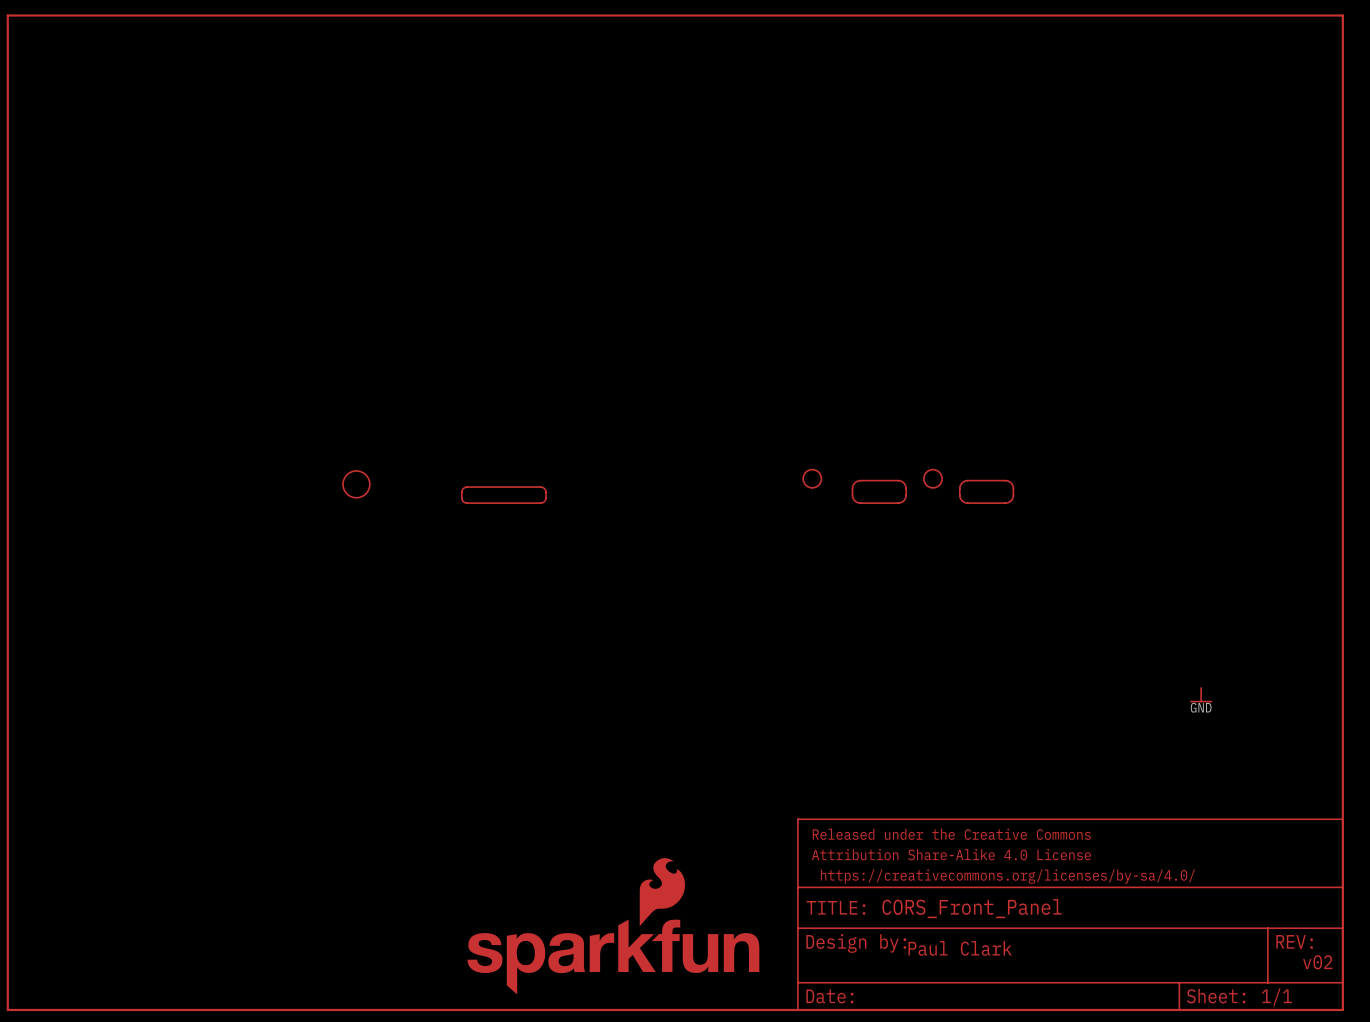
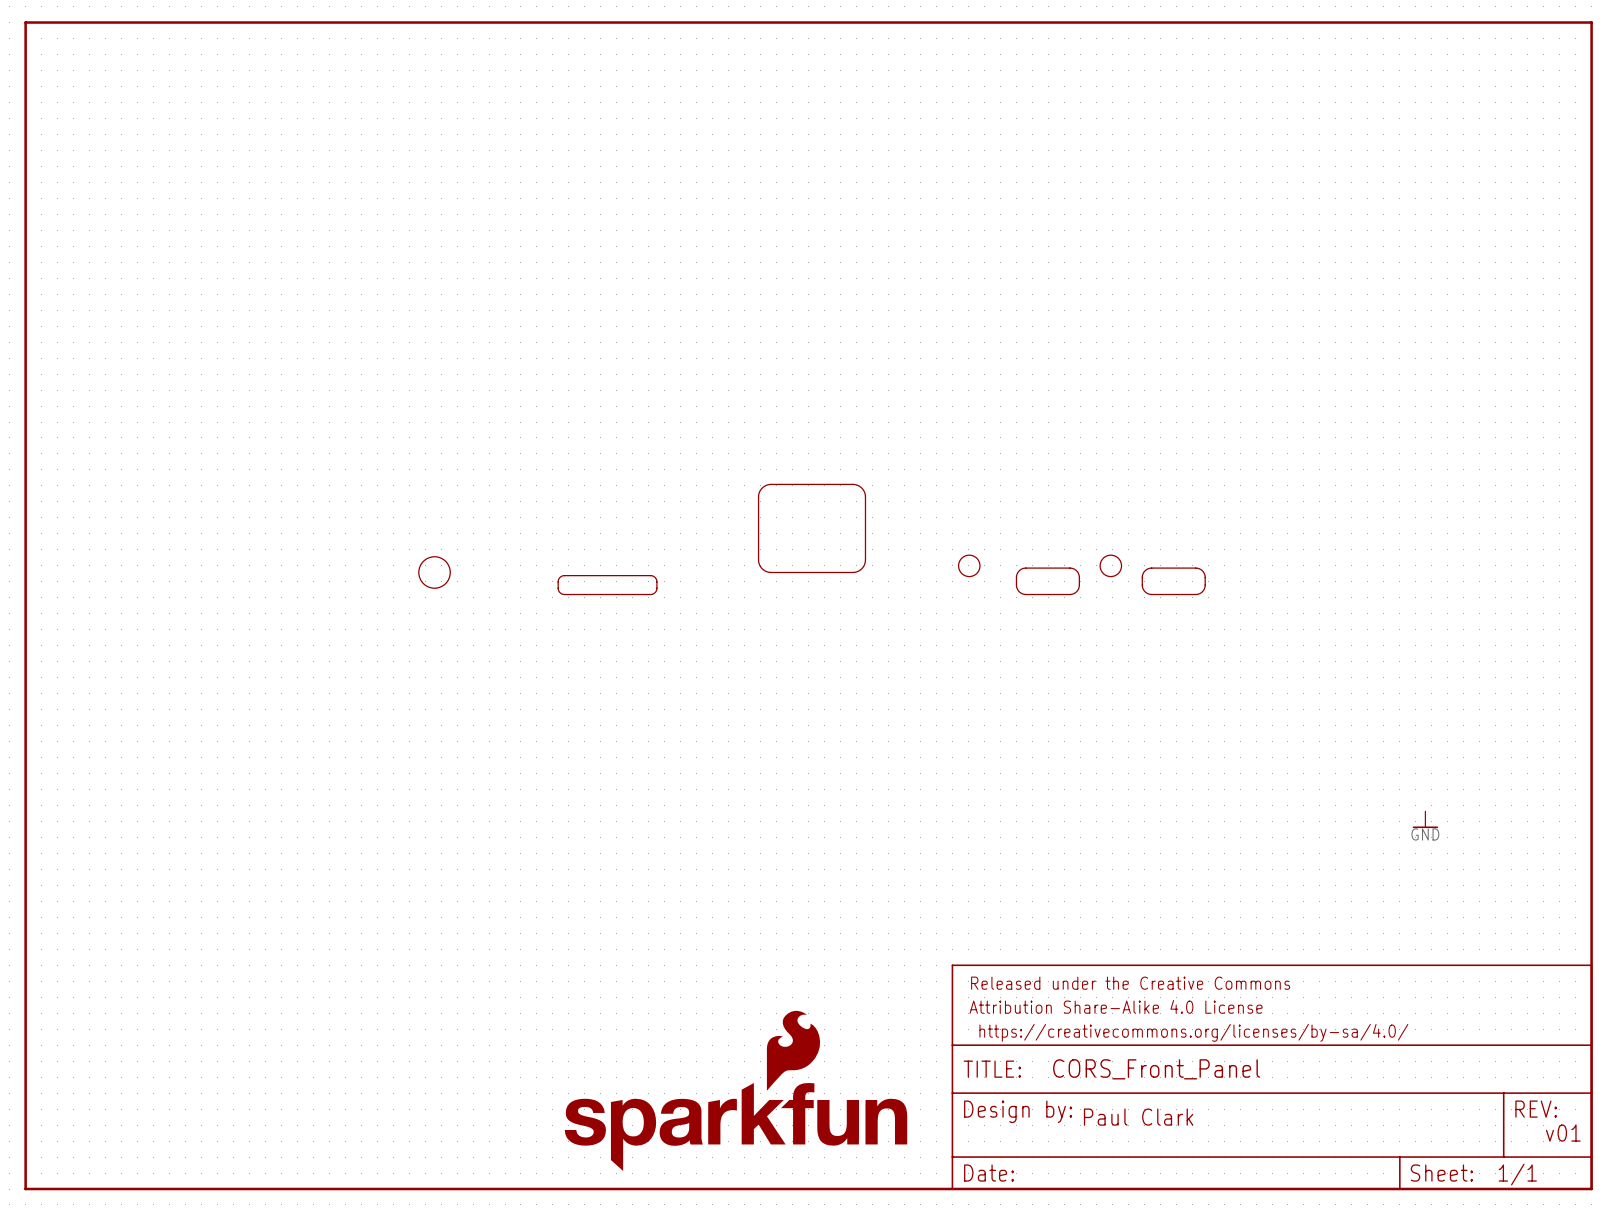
part: none -> (812, 528)
text: v02 (1317, 962) -> v01 (1563, 1133)

